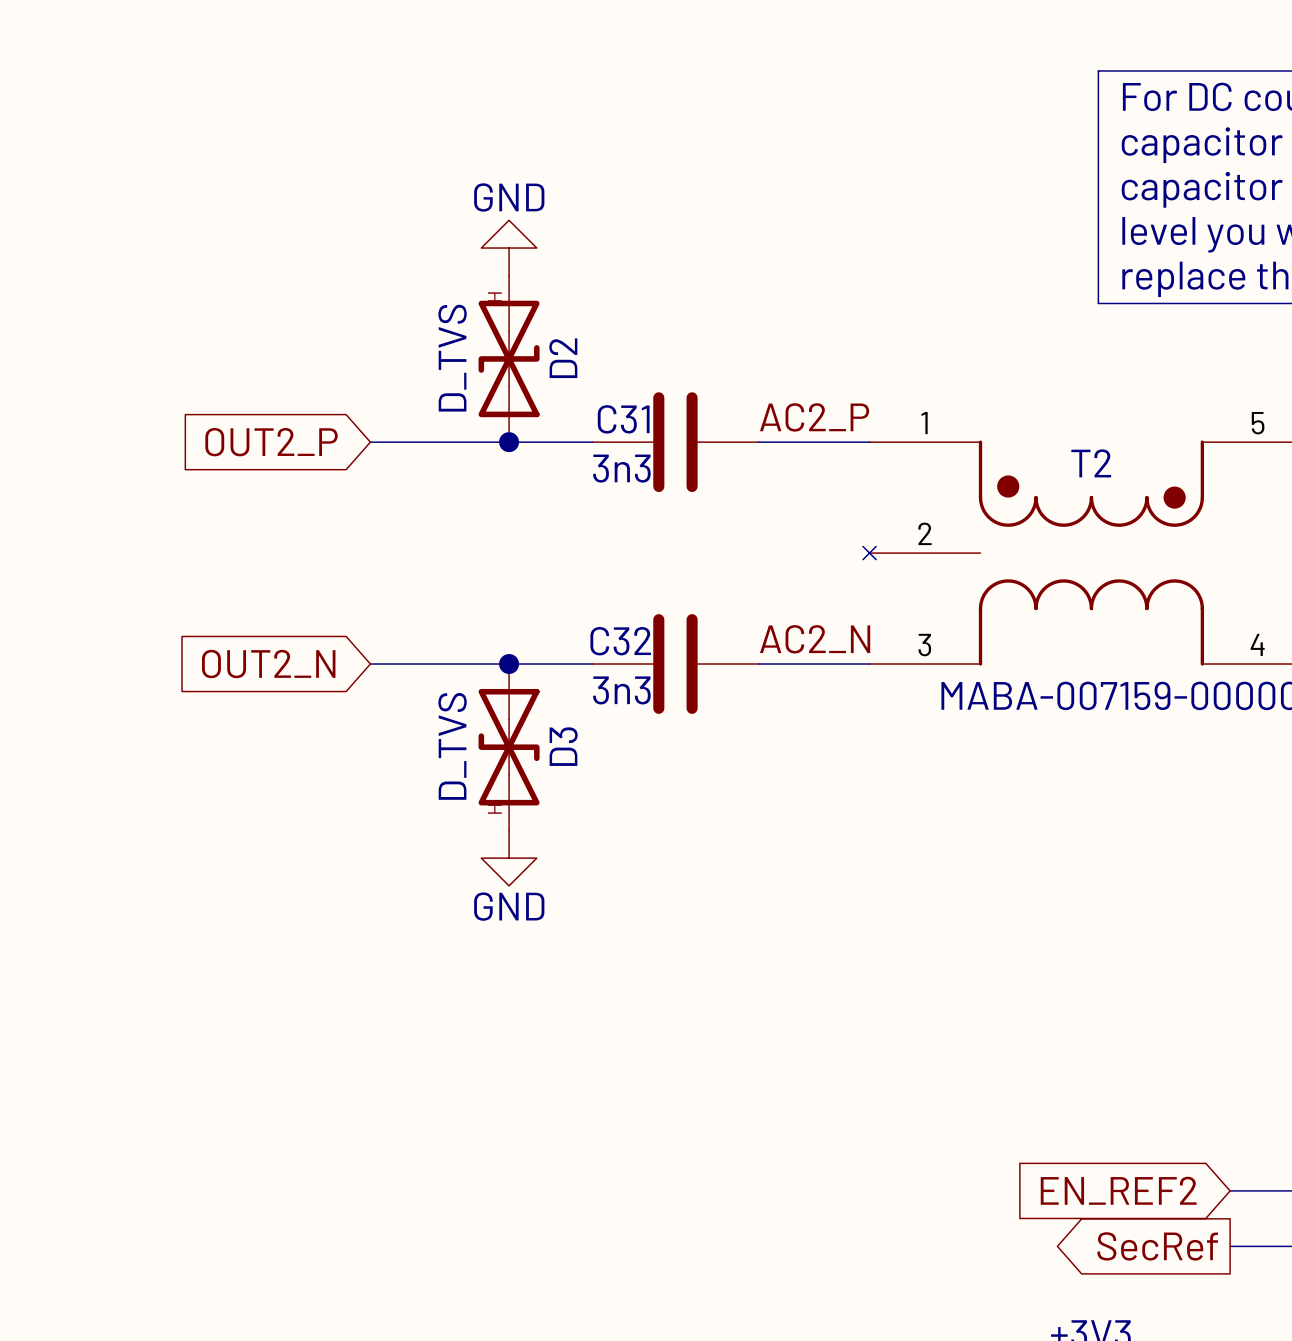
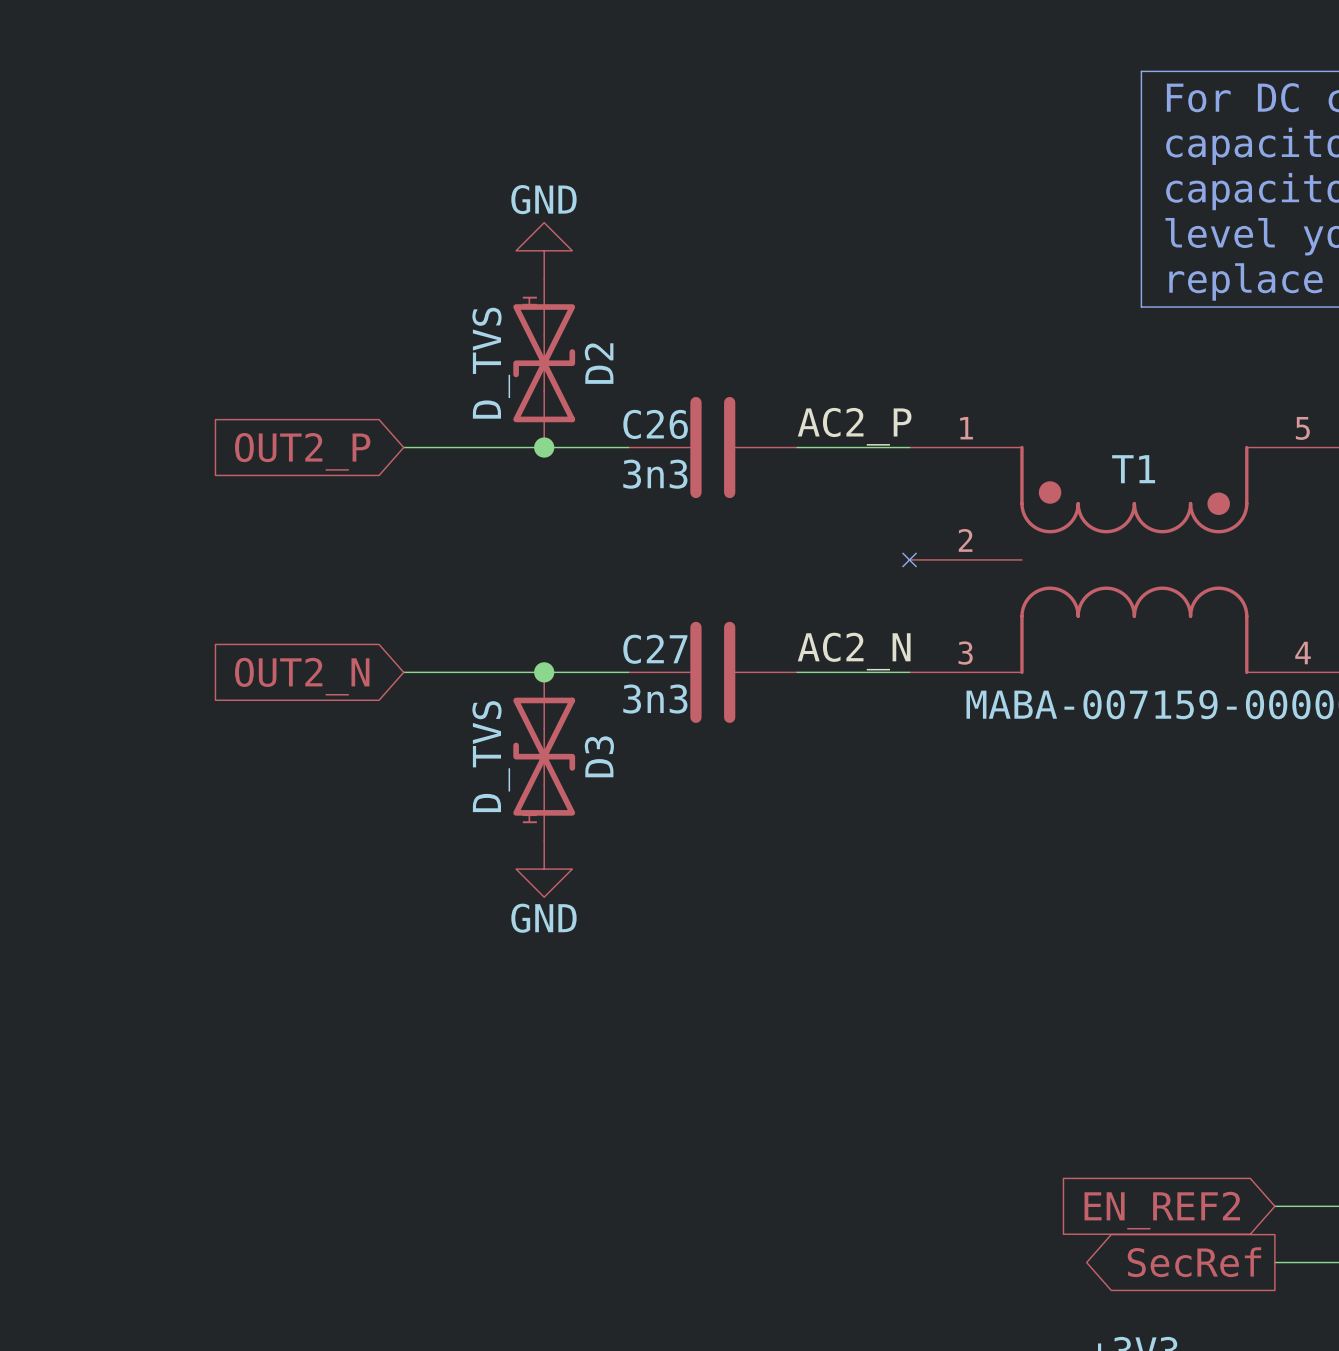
C31 name: C31 (623, 419) -> C26 (655, 424)
T2 name: T2 (1091, 463) -> T1 (1133, 469)
C32 name: C32 (620, 641) -> C27 (655, 649)

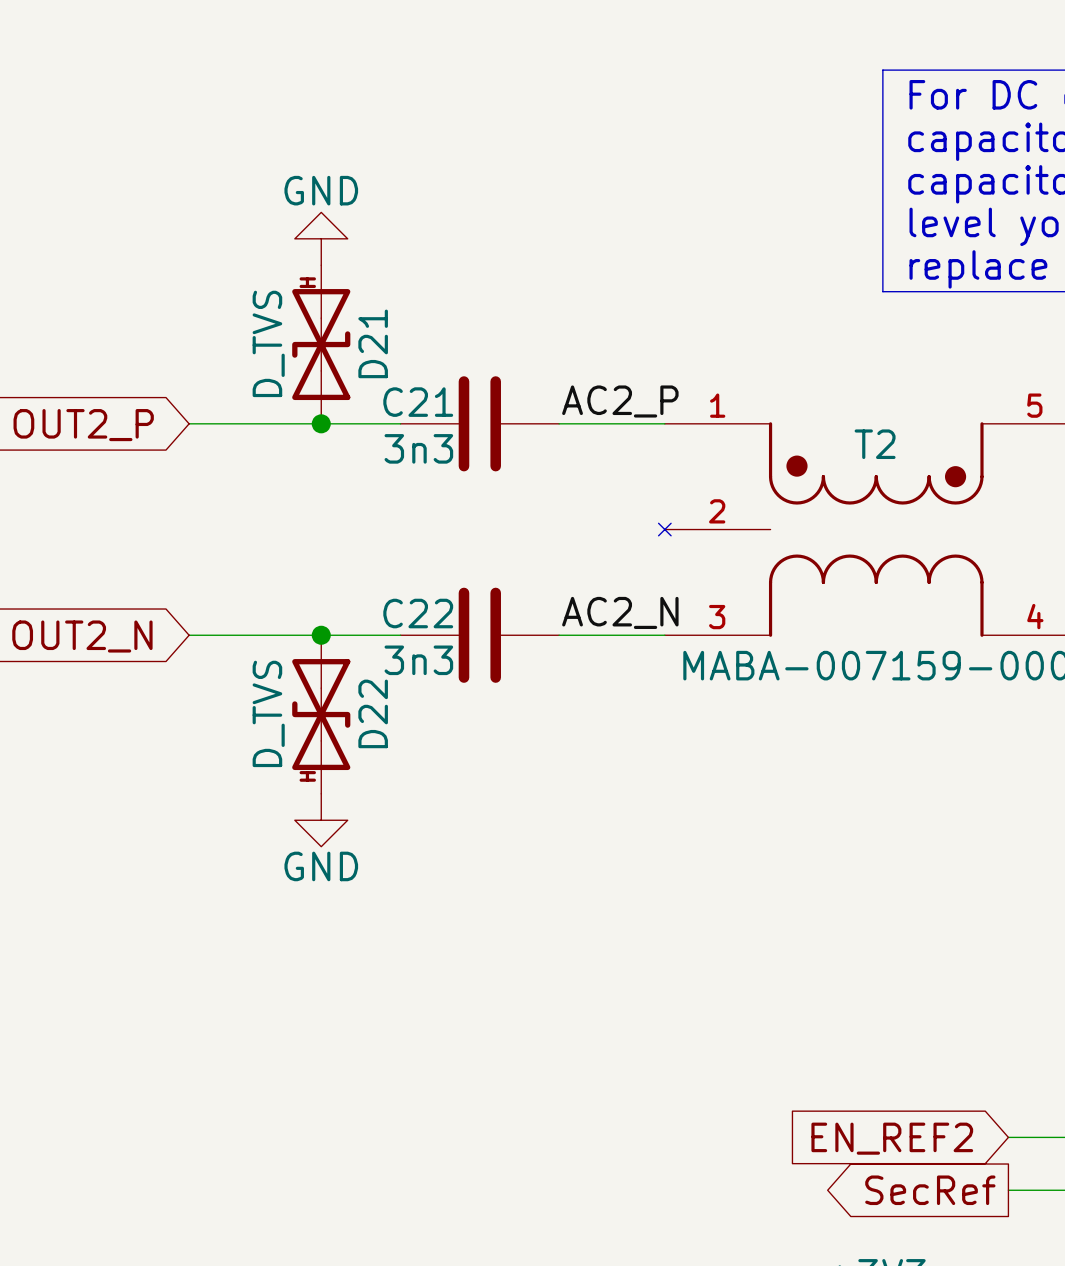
D2 name: D2 (599, 363) -> D21 (373, 343)
C26 name: C26 (655, 424) -> C21 (418, 402)
T1 name: T1 (1133, 469) -> T2 (875, 444)
C27 name: C27 (655, 649) -> C22 (418, 613)
D3 name: D3 (599, 756) -> D22 (373, 713)

